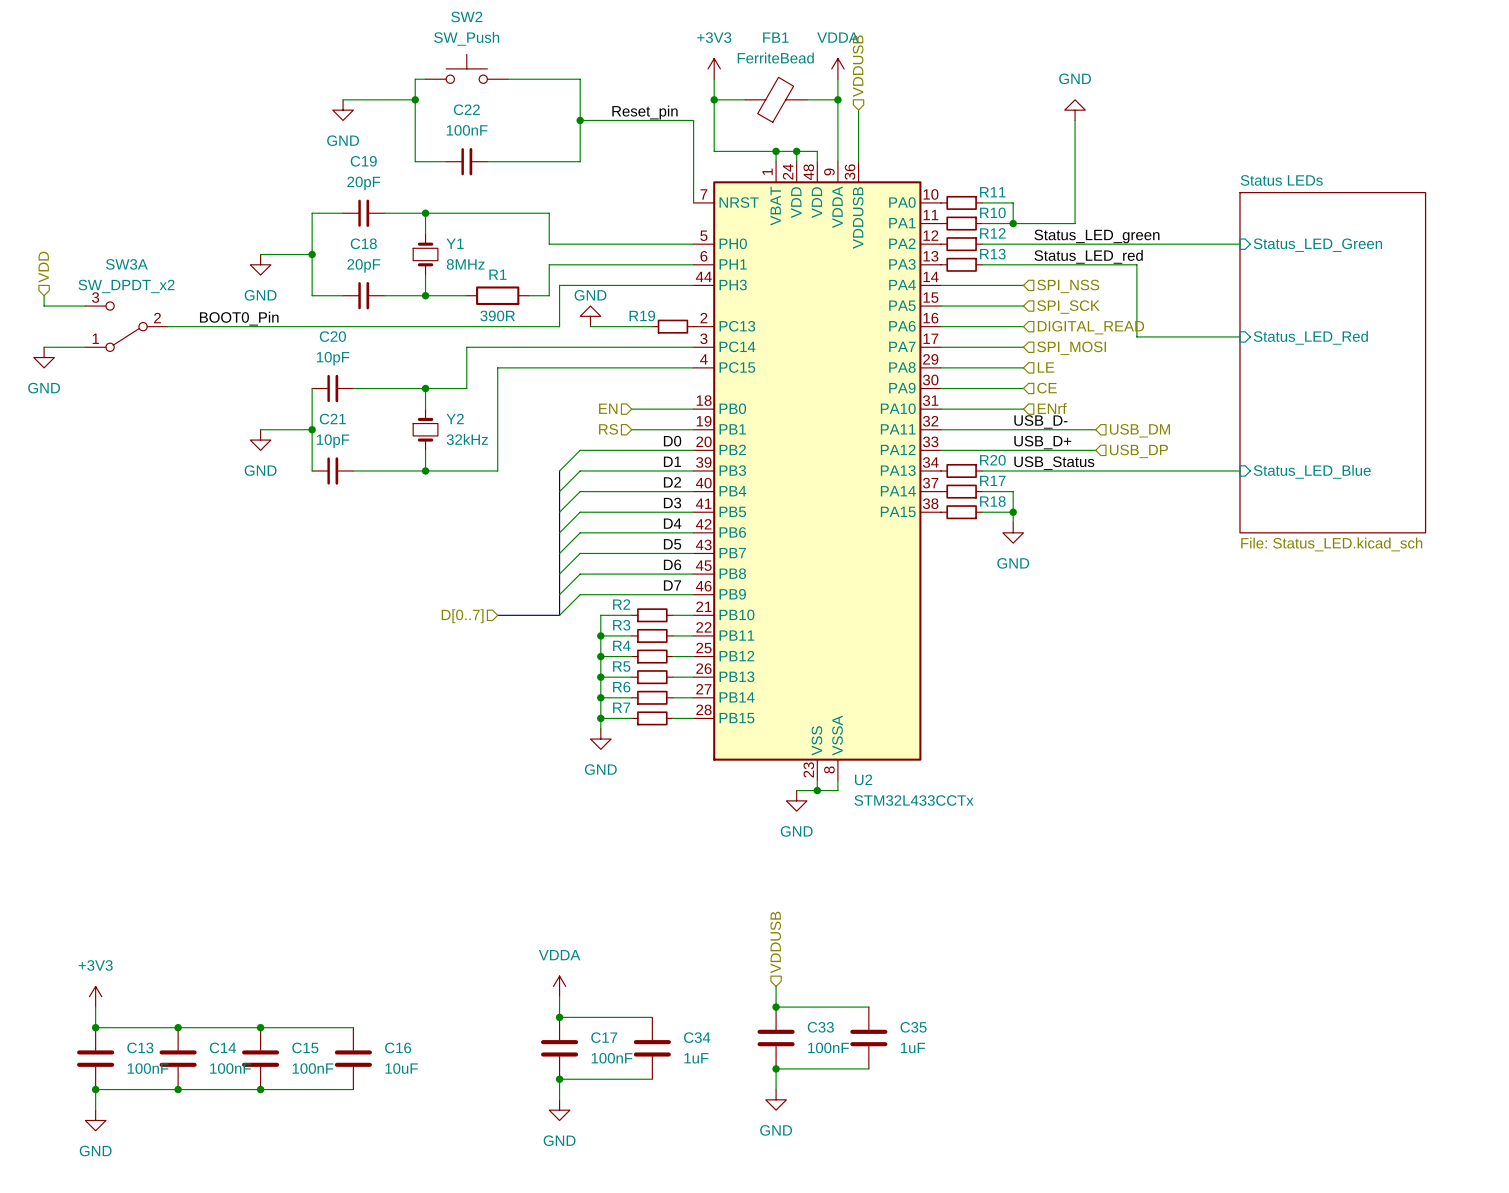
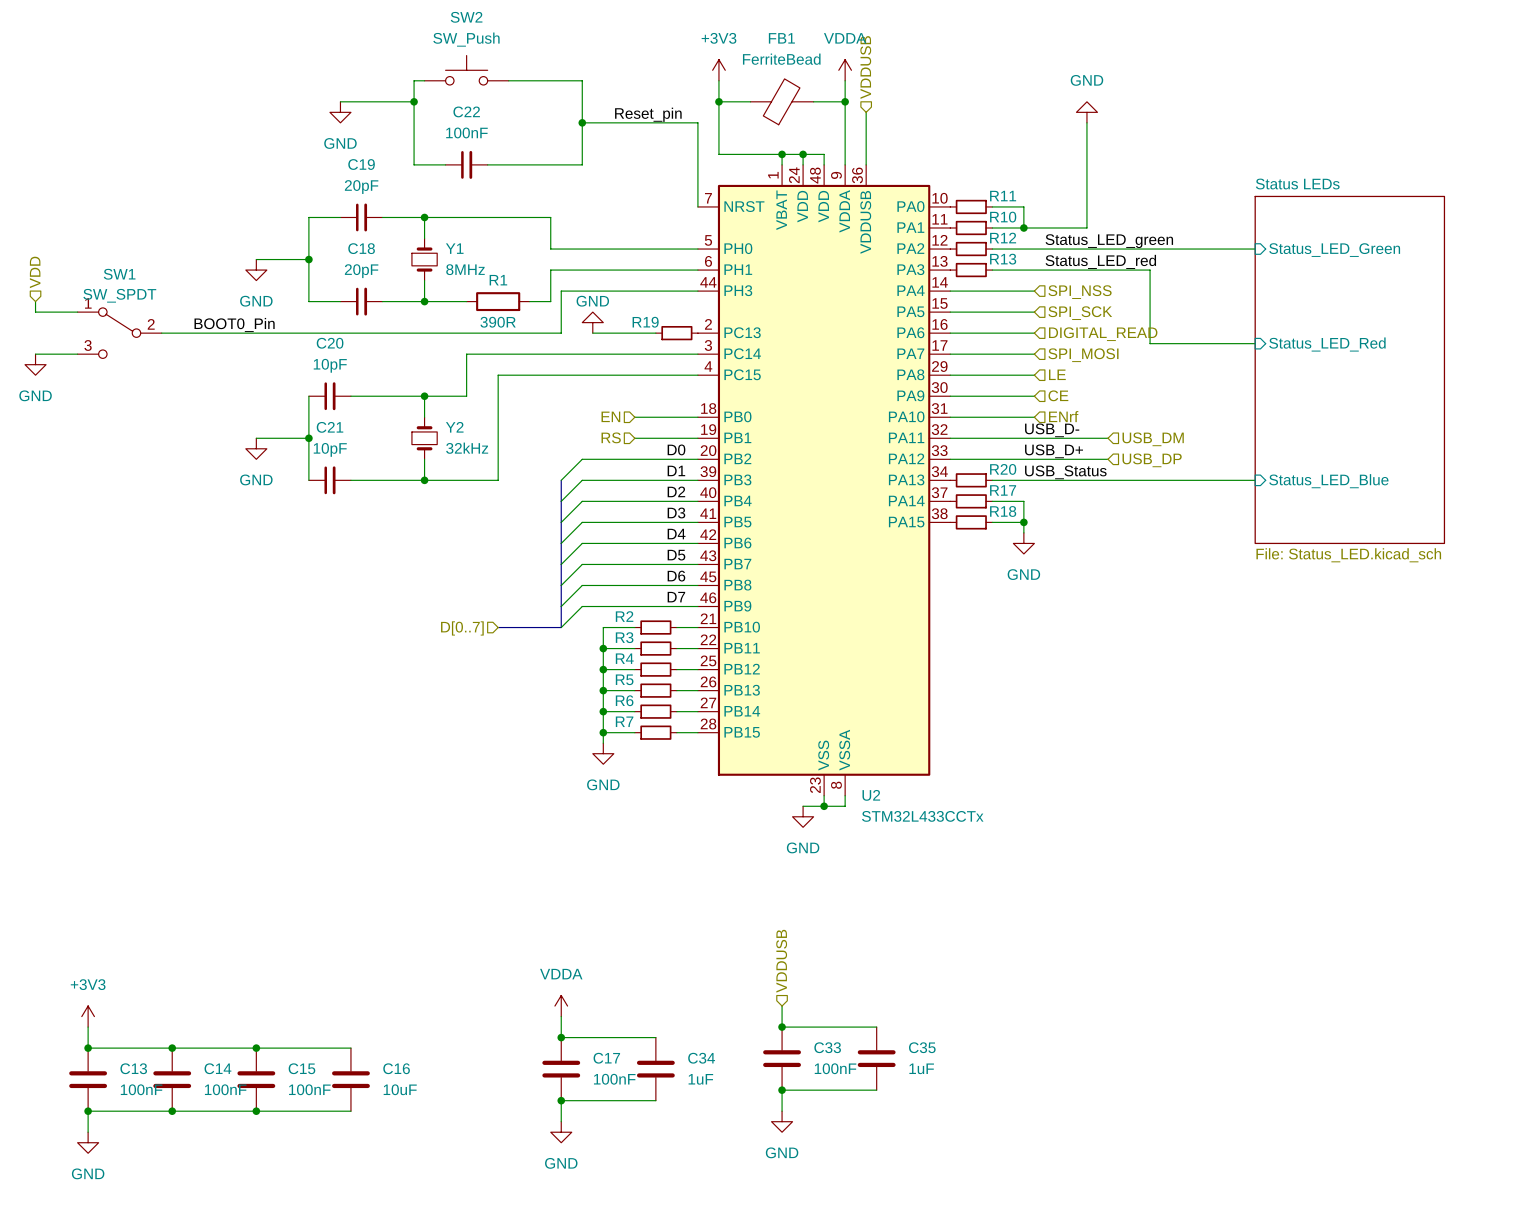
SW3A: SW_DPDT_x2 (126, 326) -> none
SW1: none -> SW_SPDT (119, 333)

